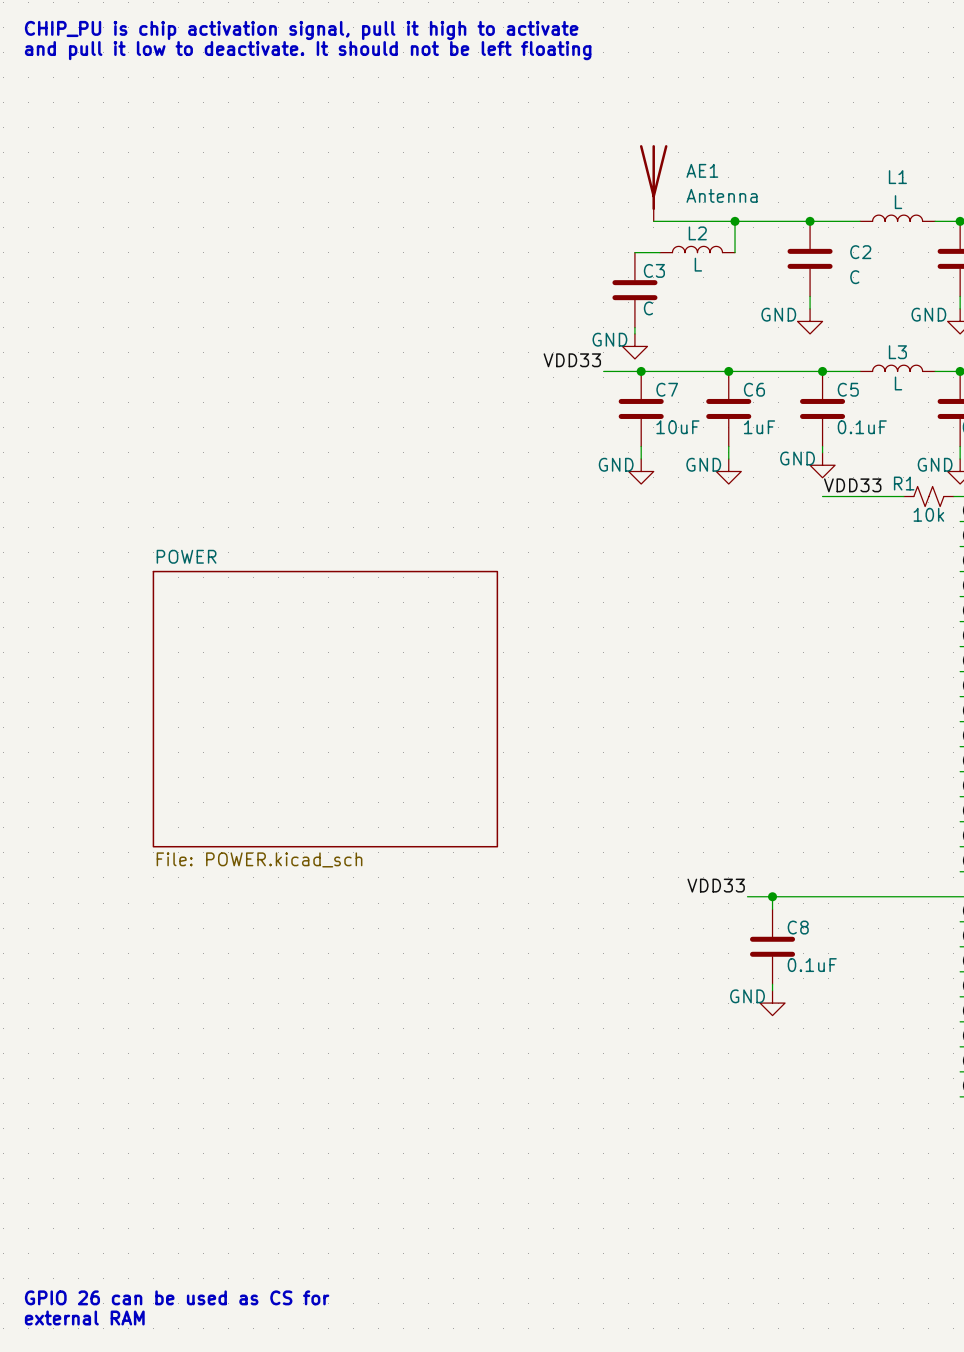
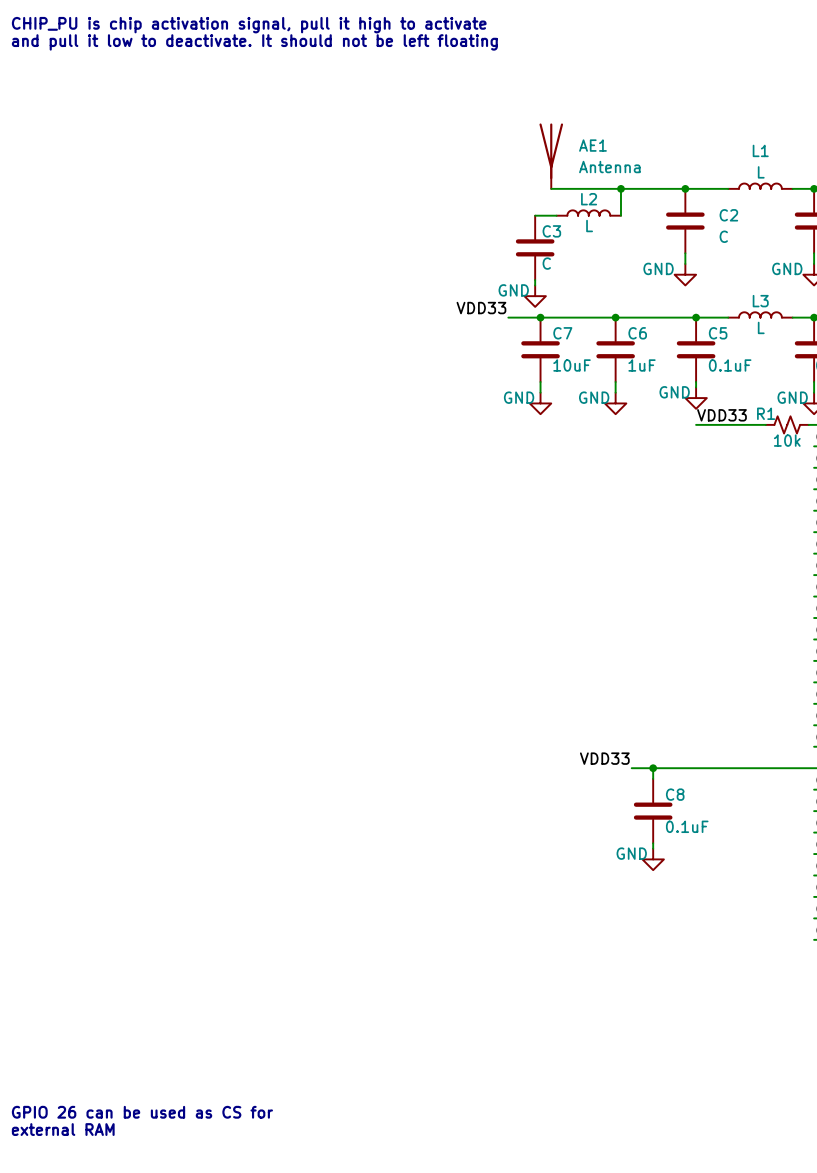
sheet POWER: File: POWER.kicad_sch (325, 709) -> none

